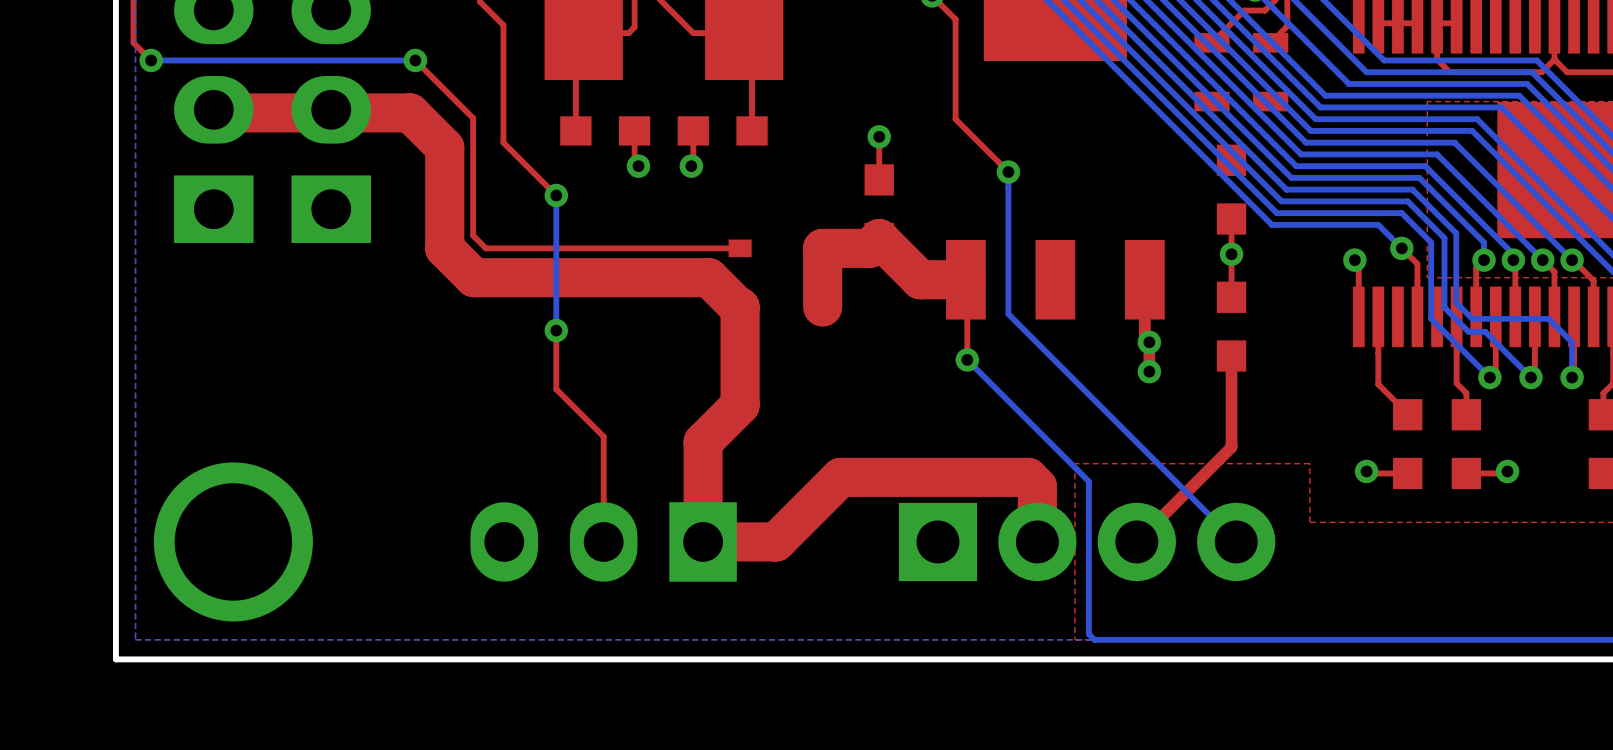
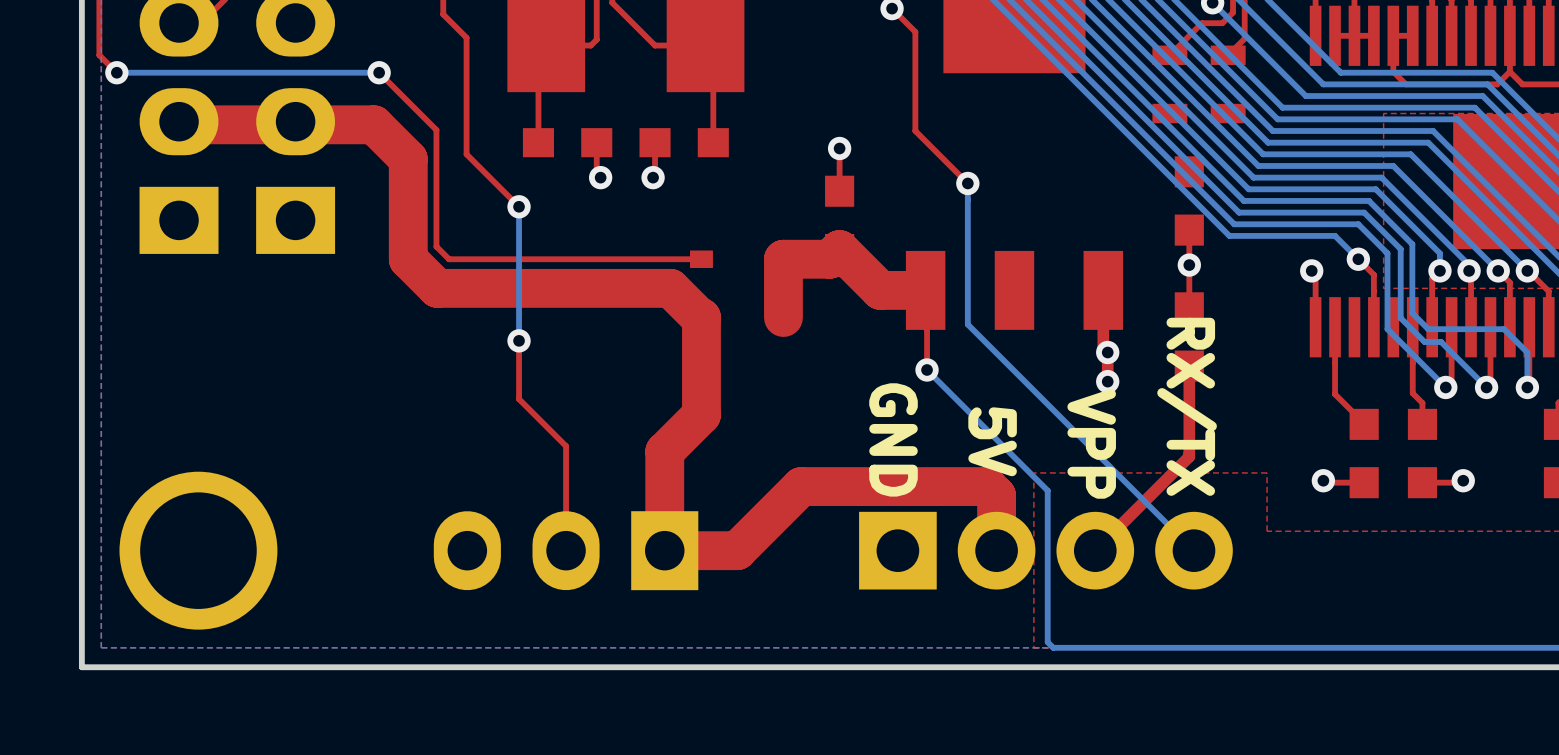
text: none -> RX/TX (1187, 406)
text: none -> GND (893, 439)
text: none -> 5V (992, 441)
text: none -> VPP (1091, 443)

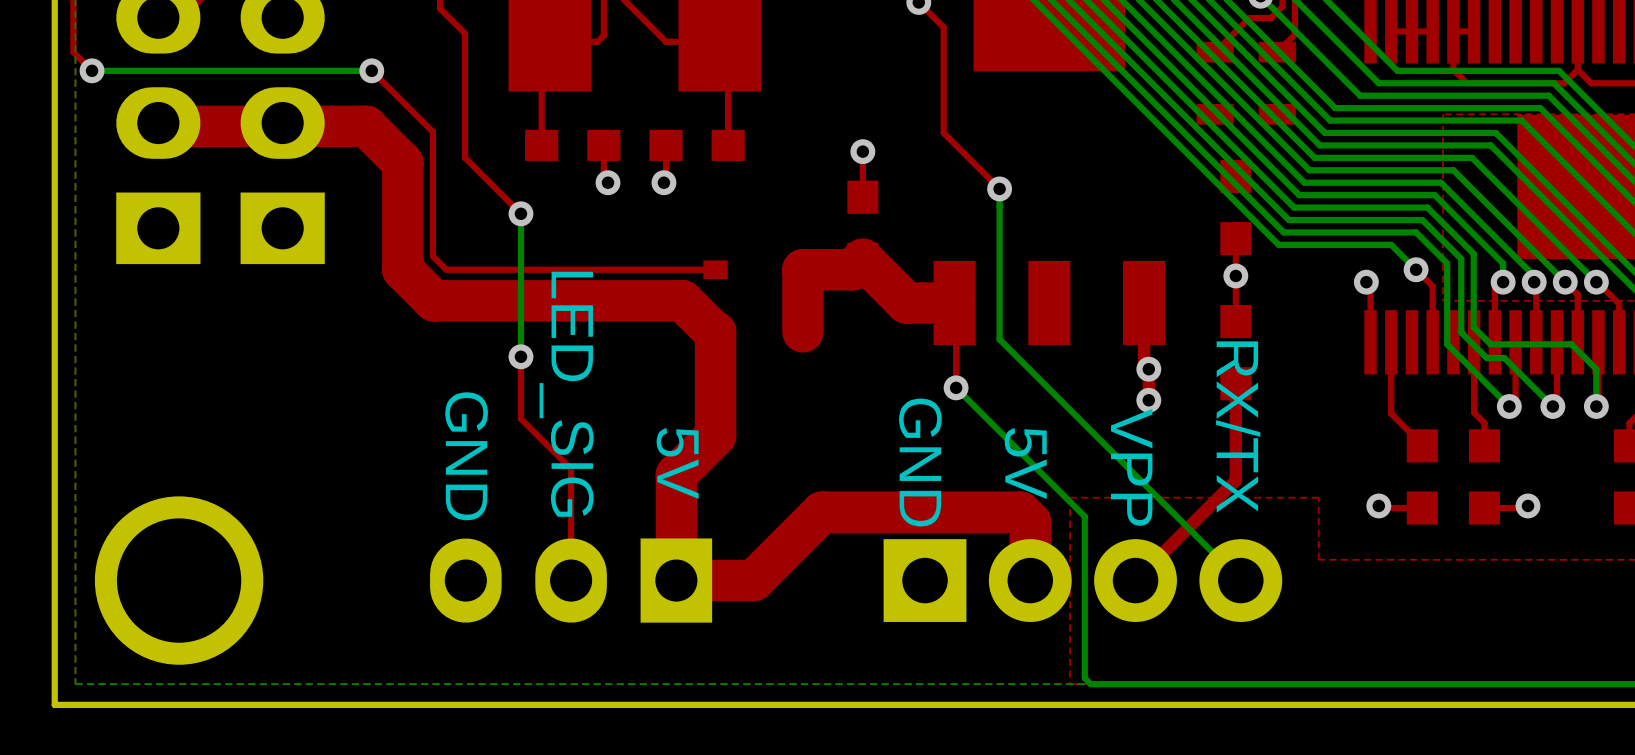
text: none -> LED_SIG (566, 394)
text: none -> GND (466, 456)
text: none -> 5V (677, 463)

